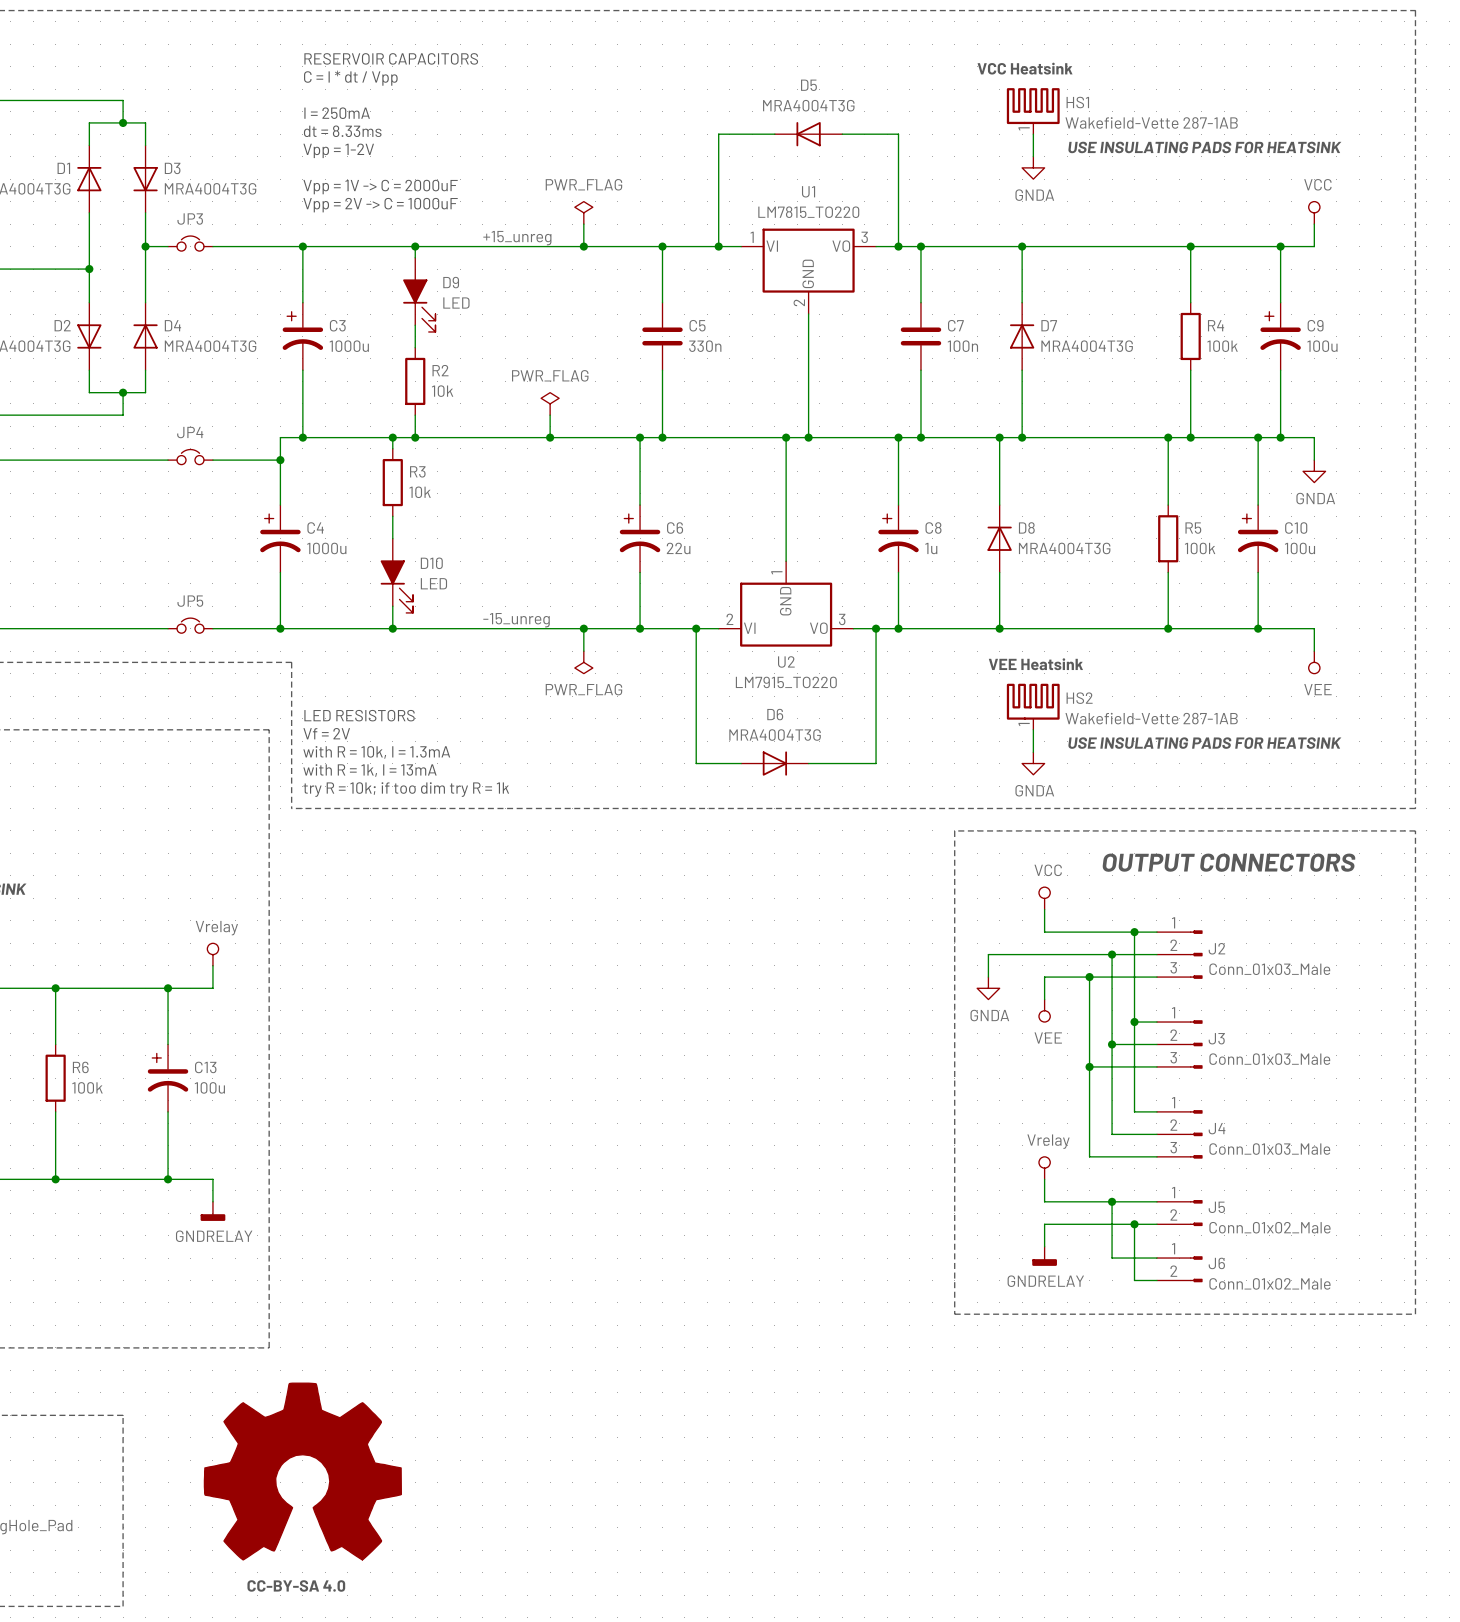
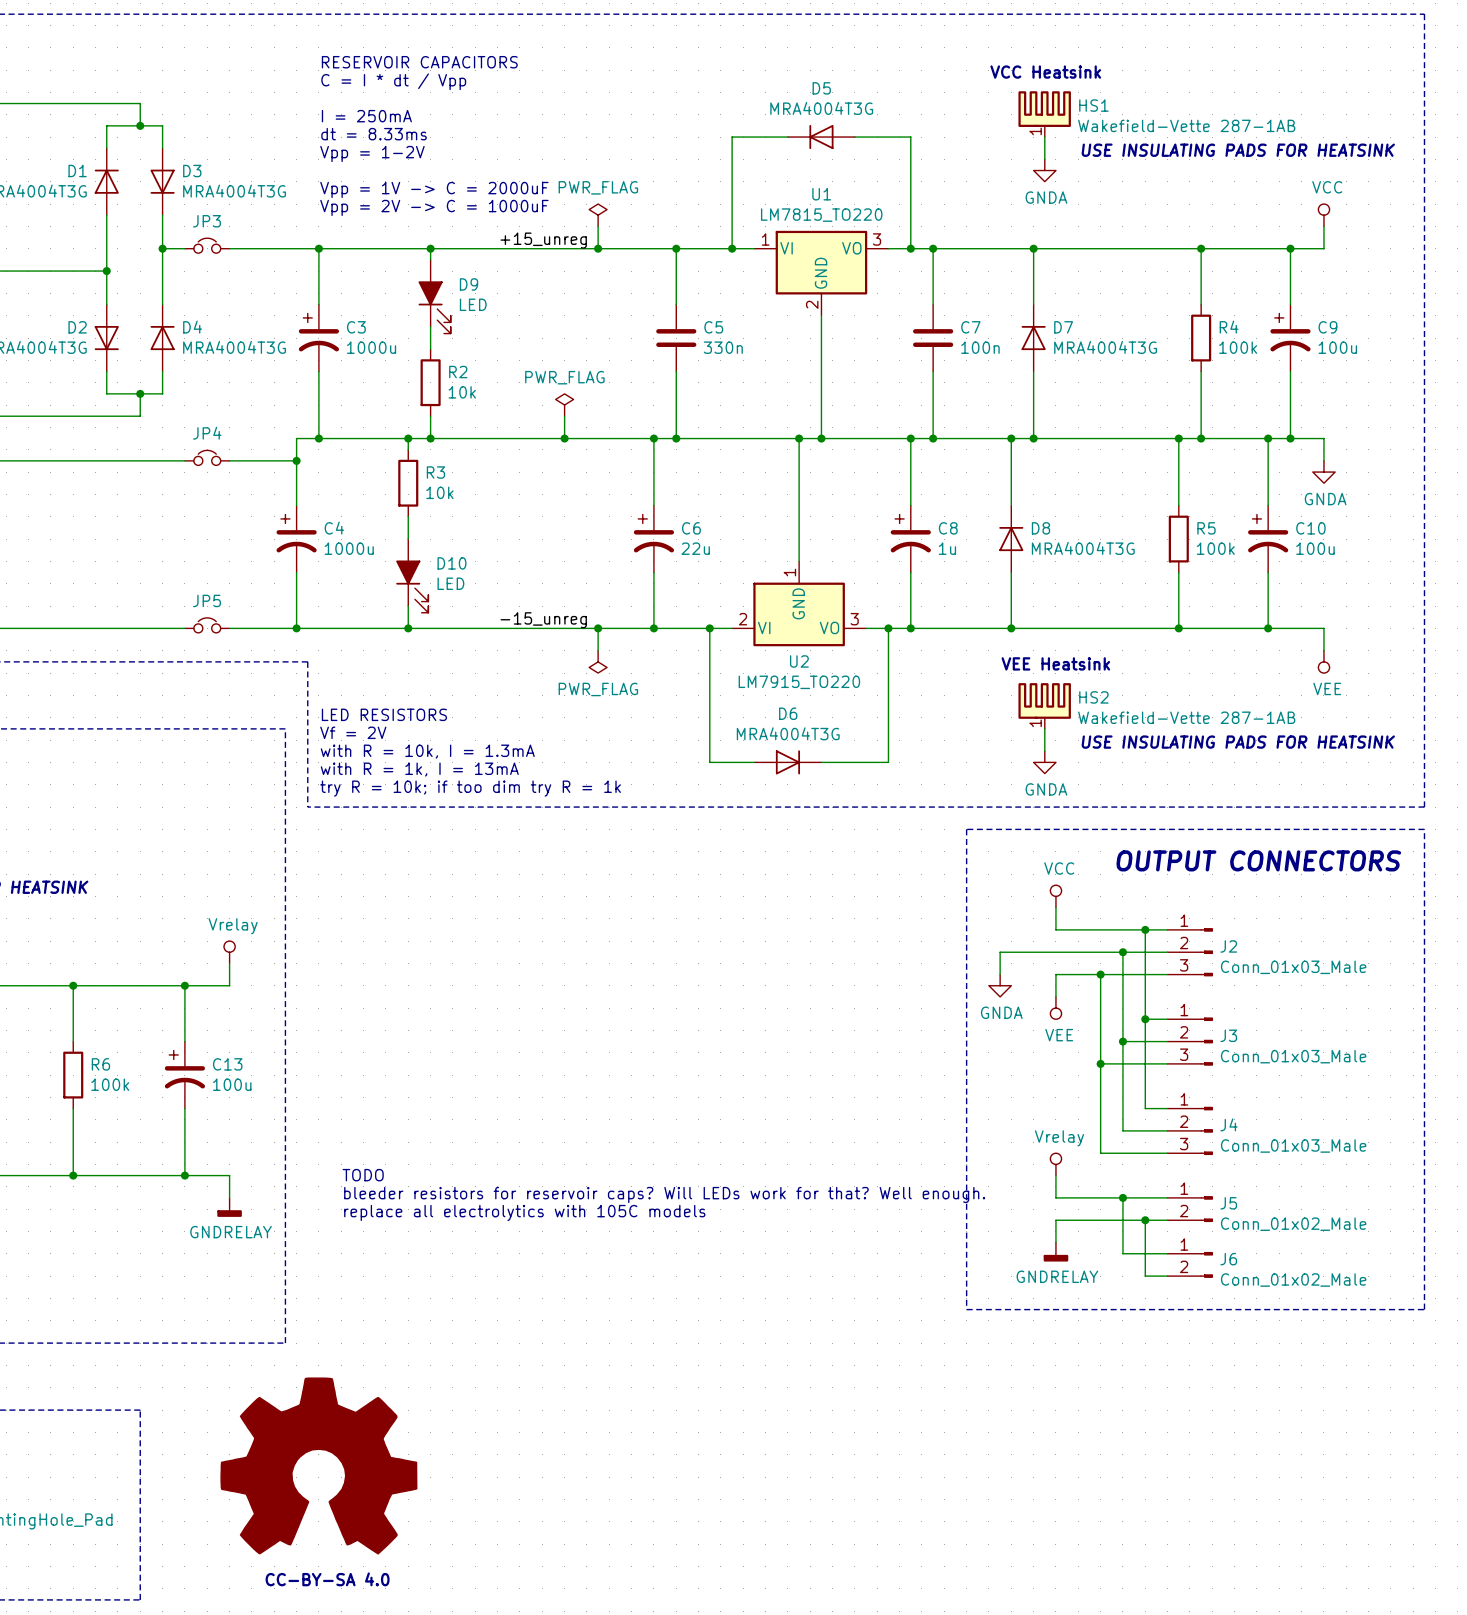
text: none -> TODO (363, 1175)
text: none -> bleeder resistors for reservoir caps? Will LEDs work for that? Well enough. (664, 1194)
text: none -> replace all electrolytics with 105C models (524, 1212)

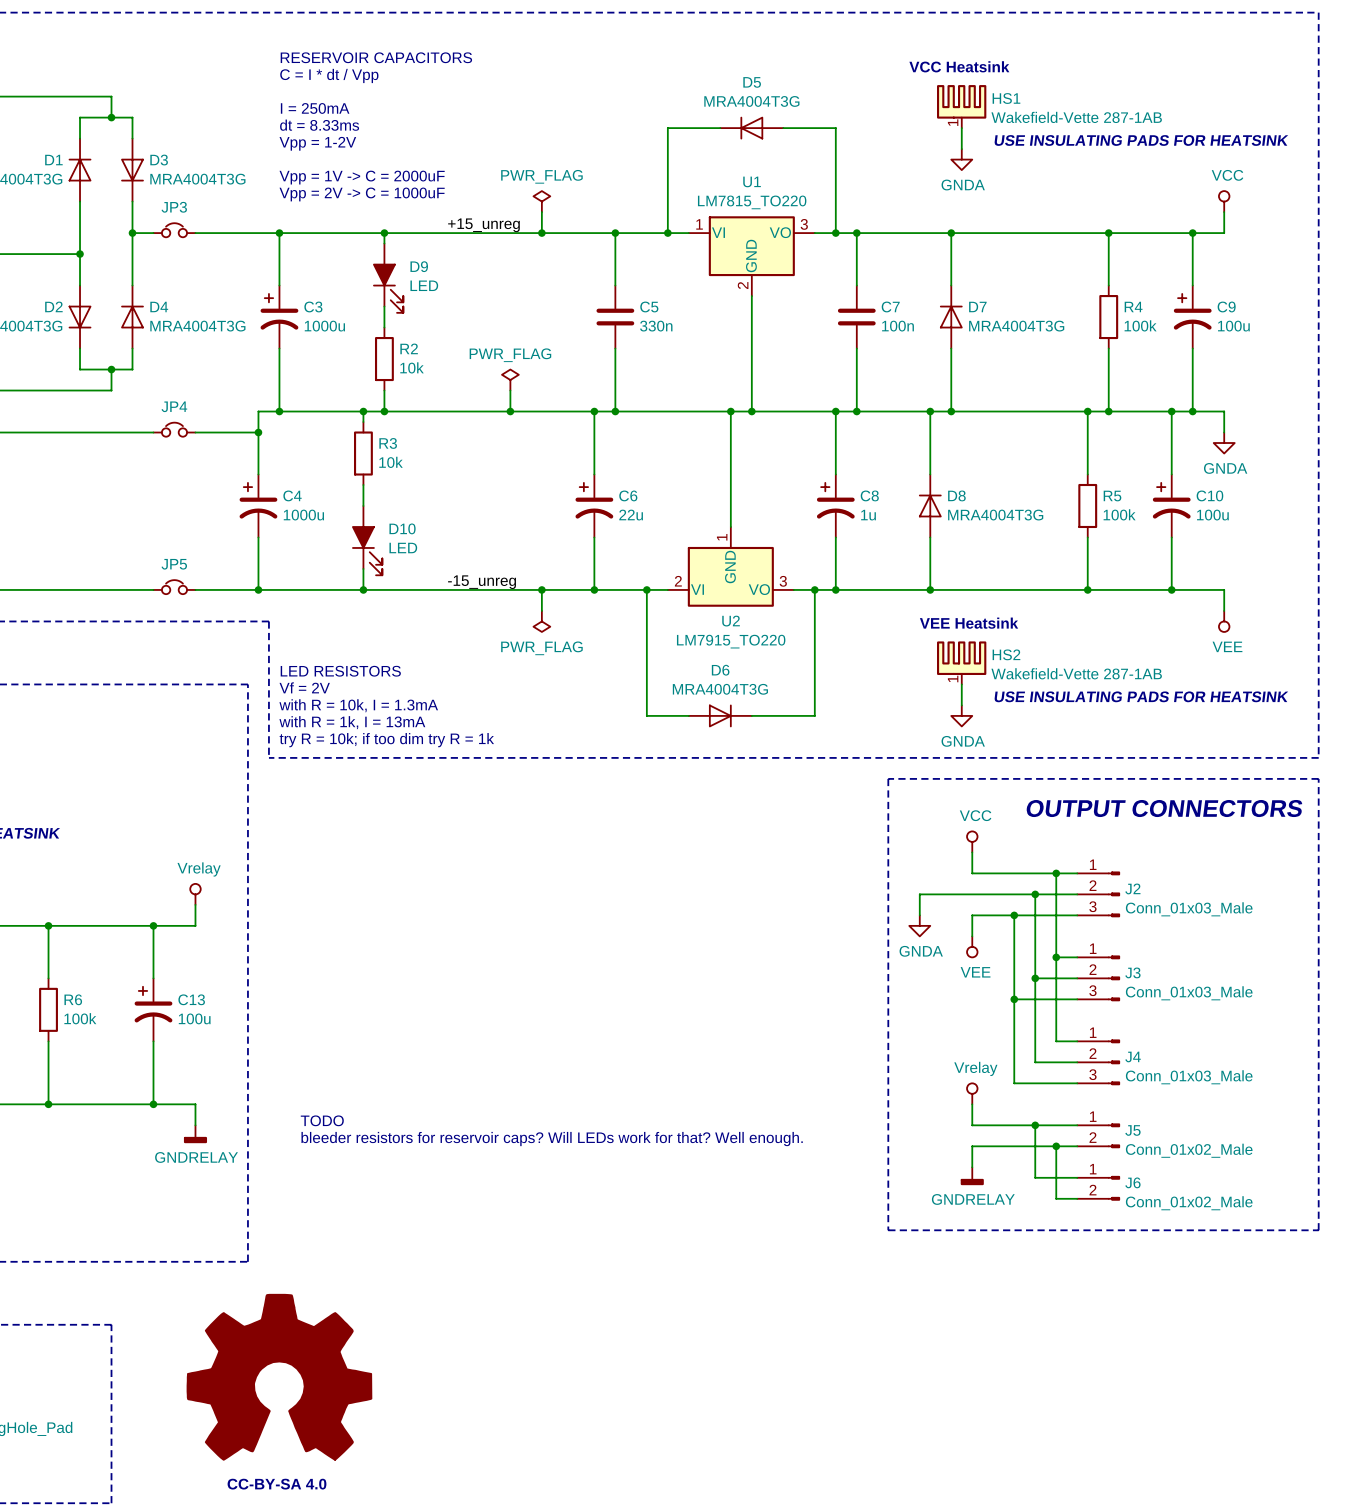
text: TODO (363, 1175) -> none
text: bleeder resistors for reservoir caps? Will LEDs work for that? Well enough. (664, 1194) -> TODO (322, 1120)
text: replace all electrolytics with 105C models (524, 1212) -> bleeder resistors for reservoir caps? Will LEDs work for that? Well enough. (552, 1139)

